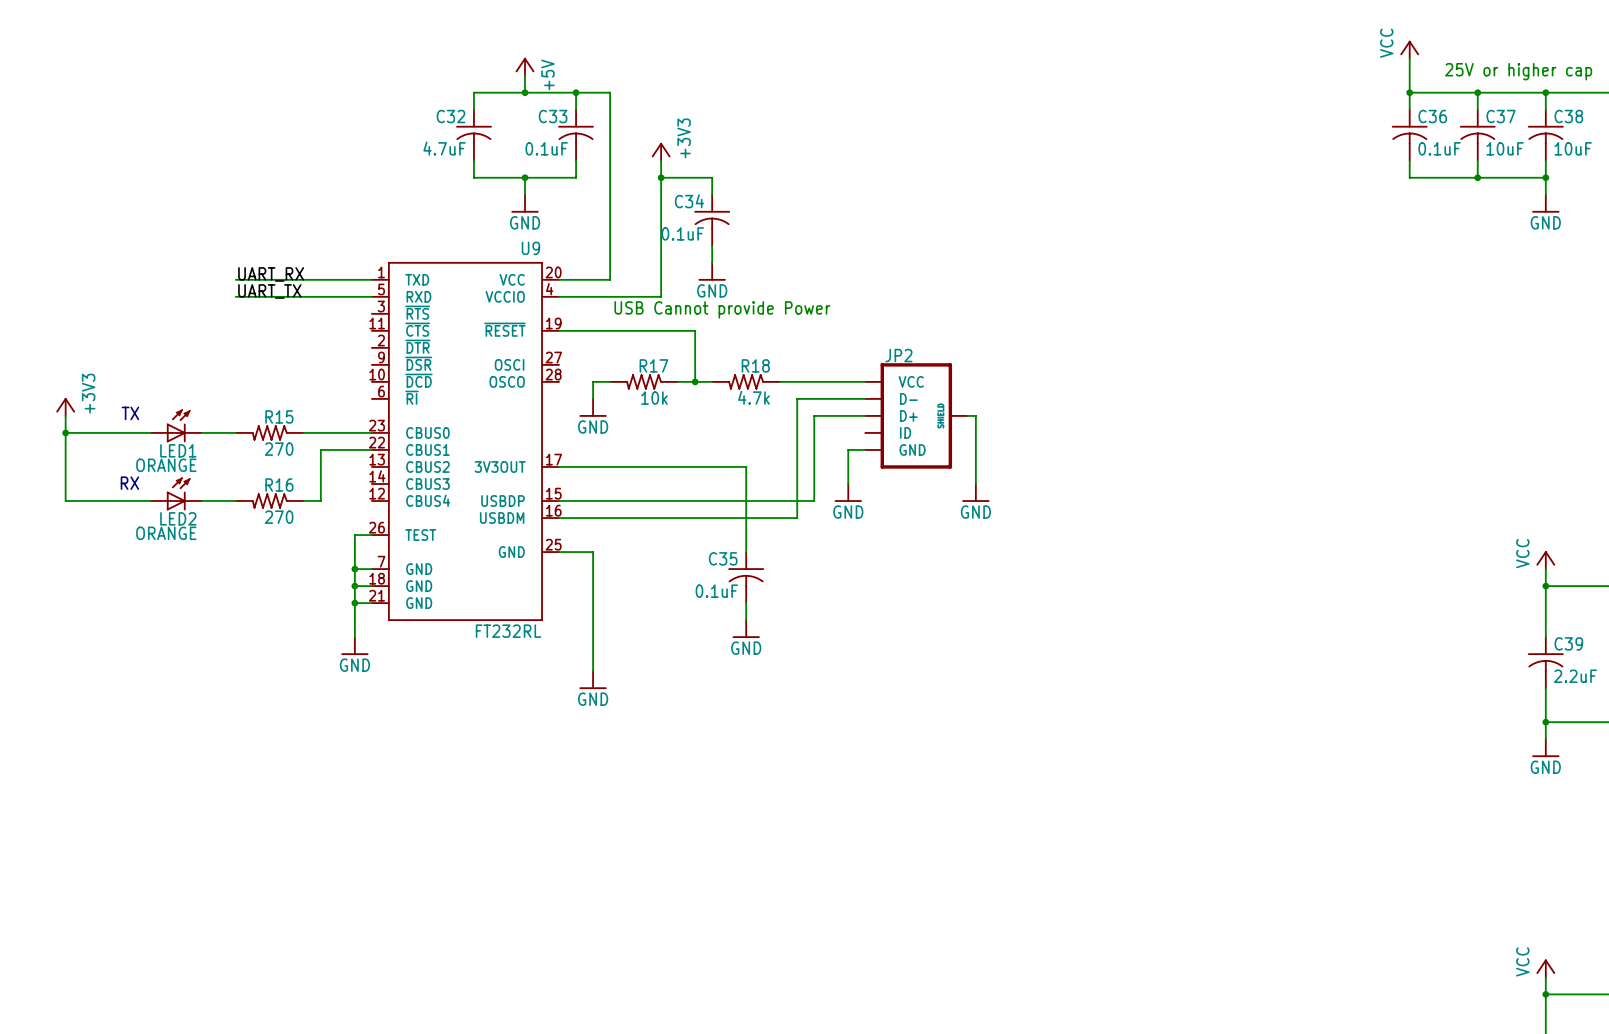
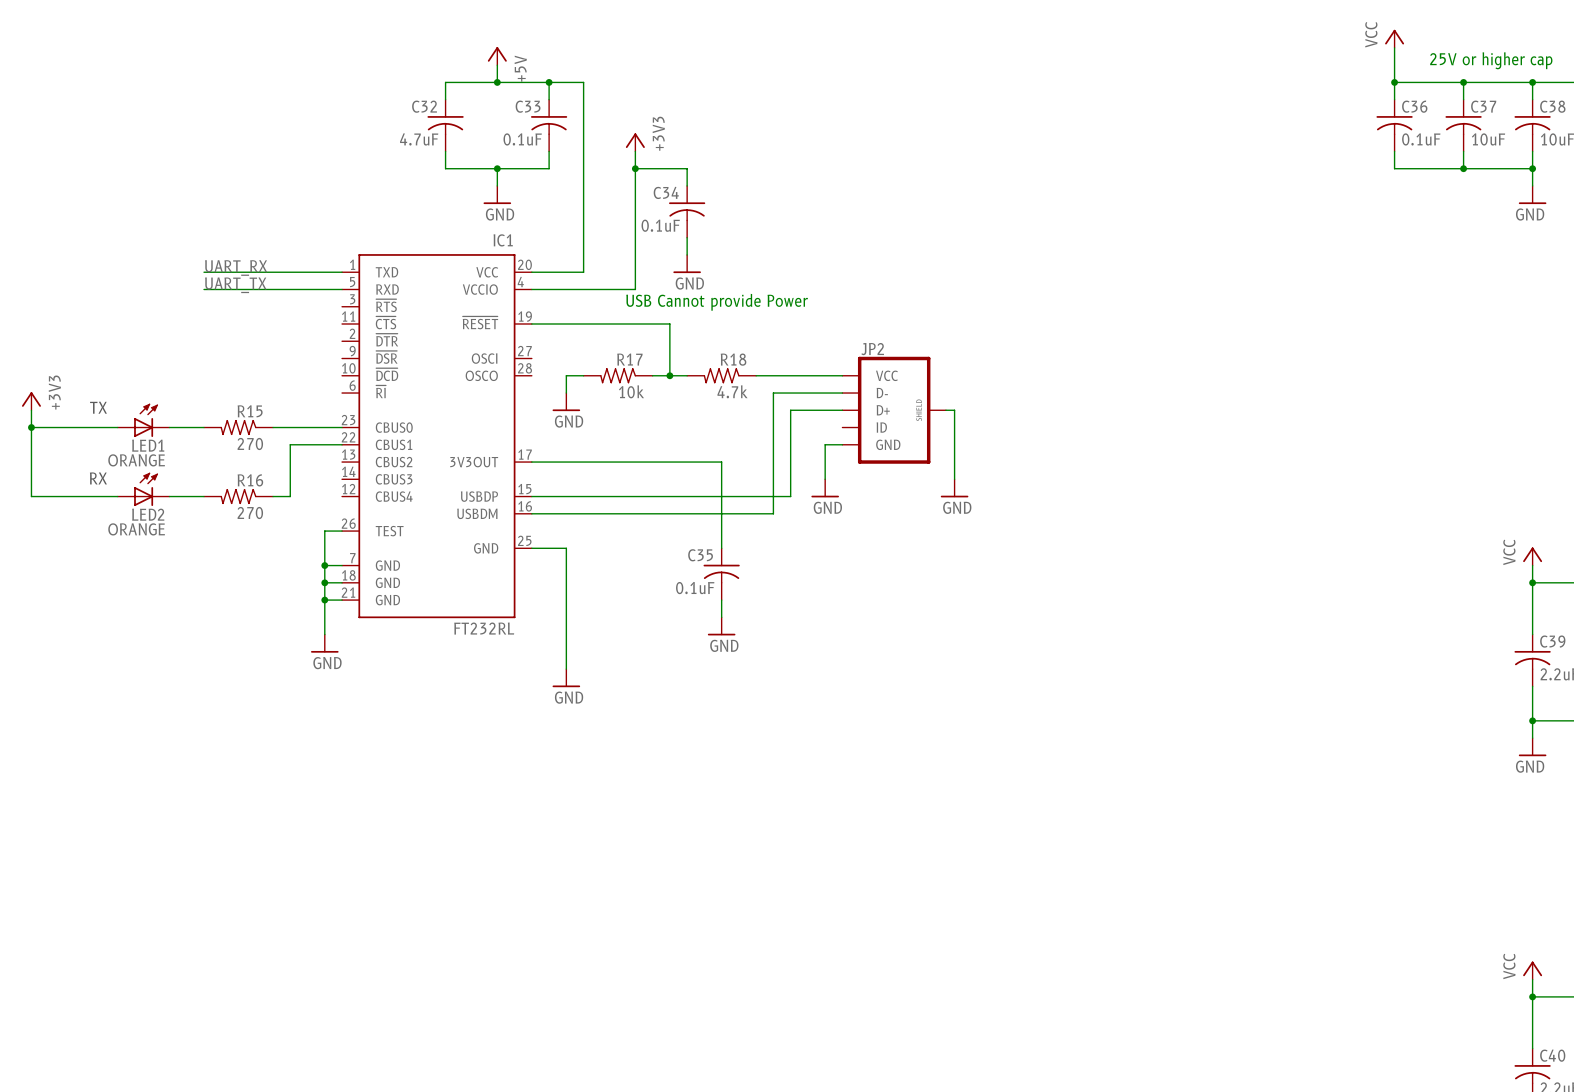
U9 name: U9 (530, 248) -> IC1 (503, 240)

